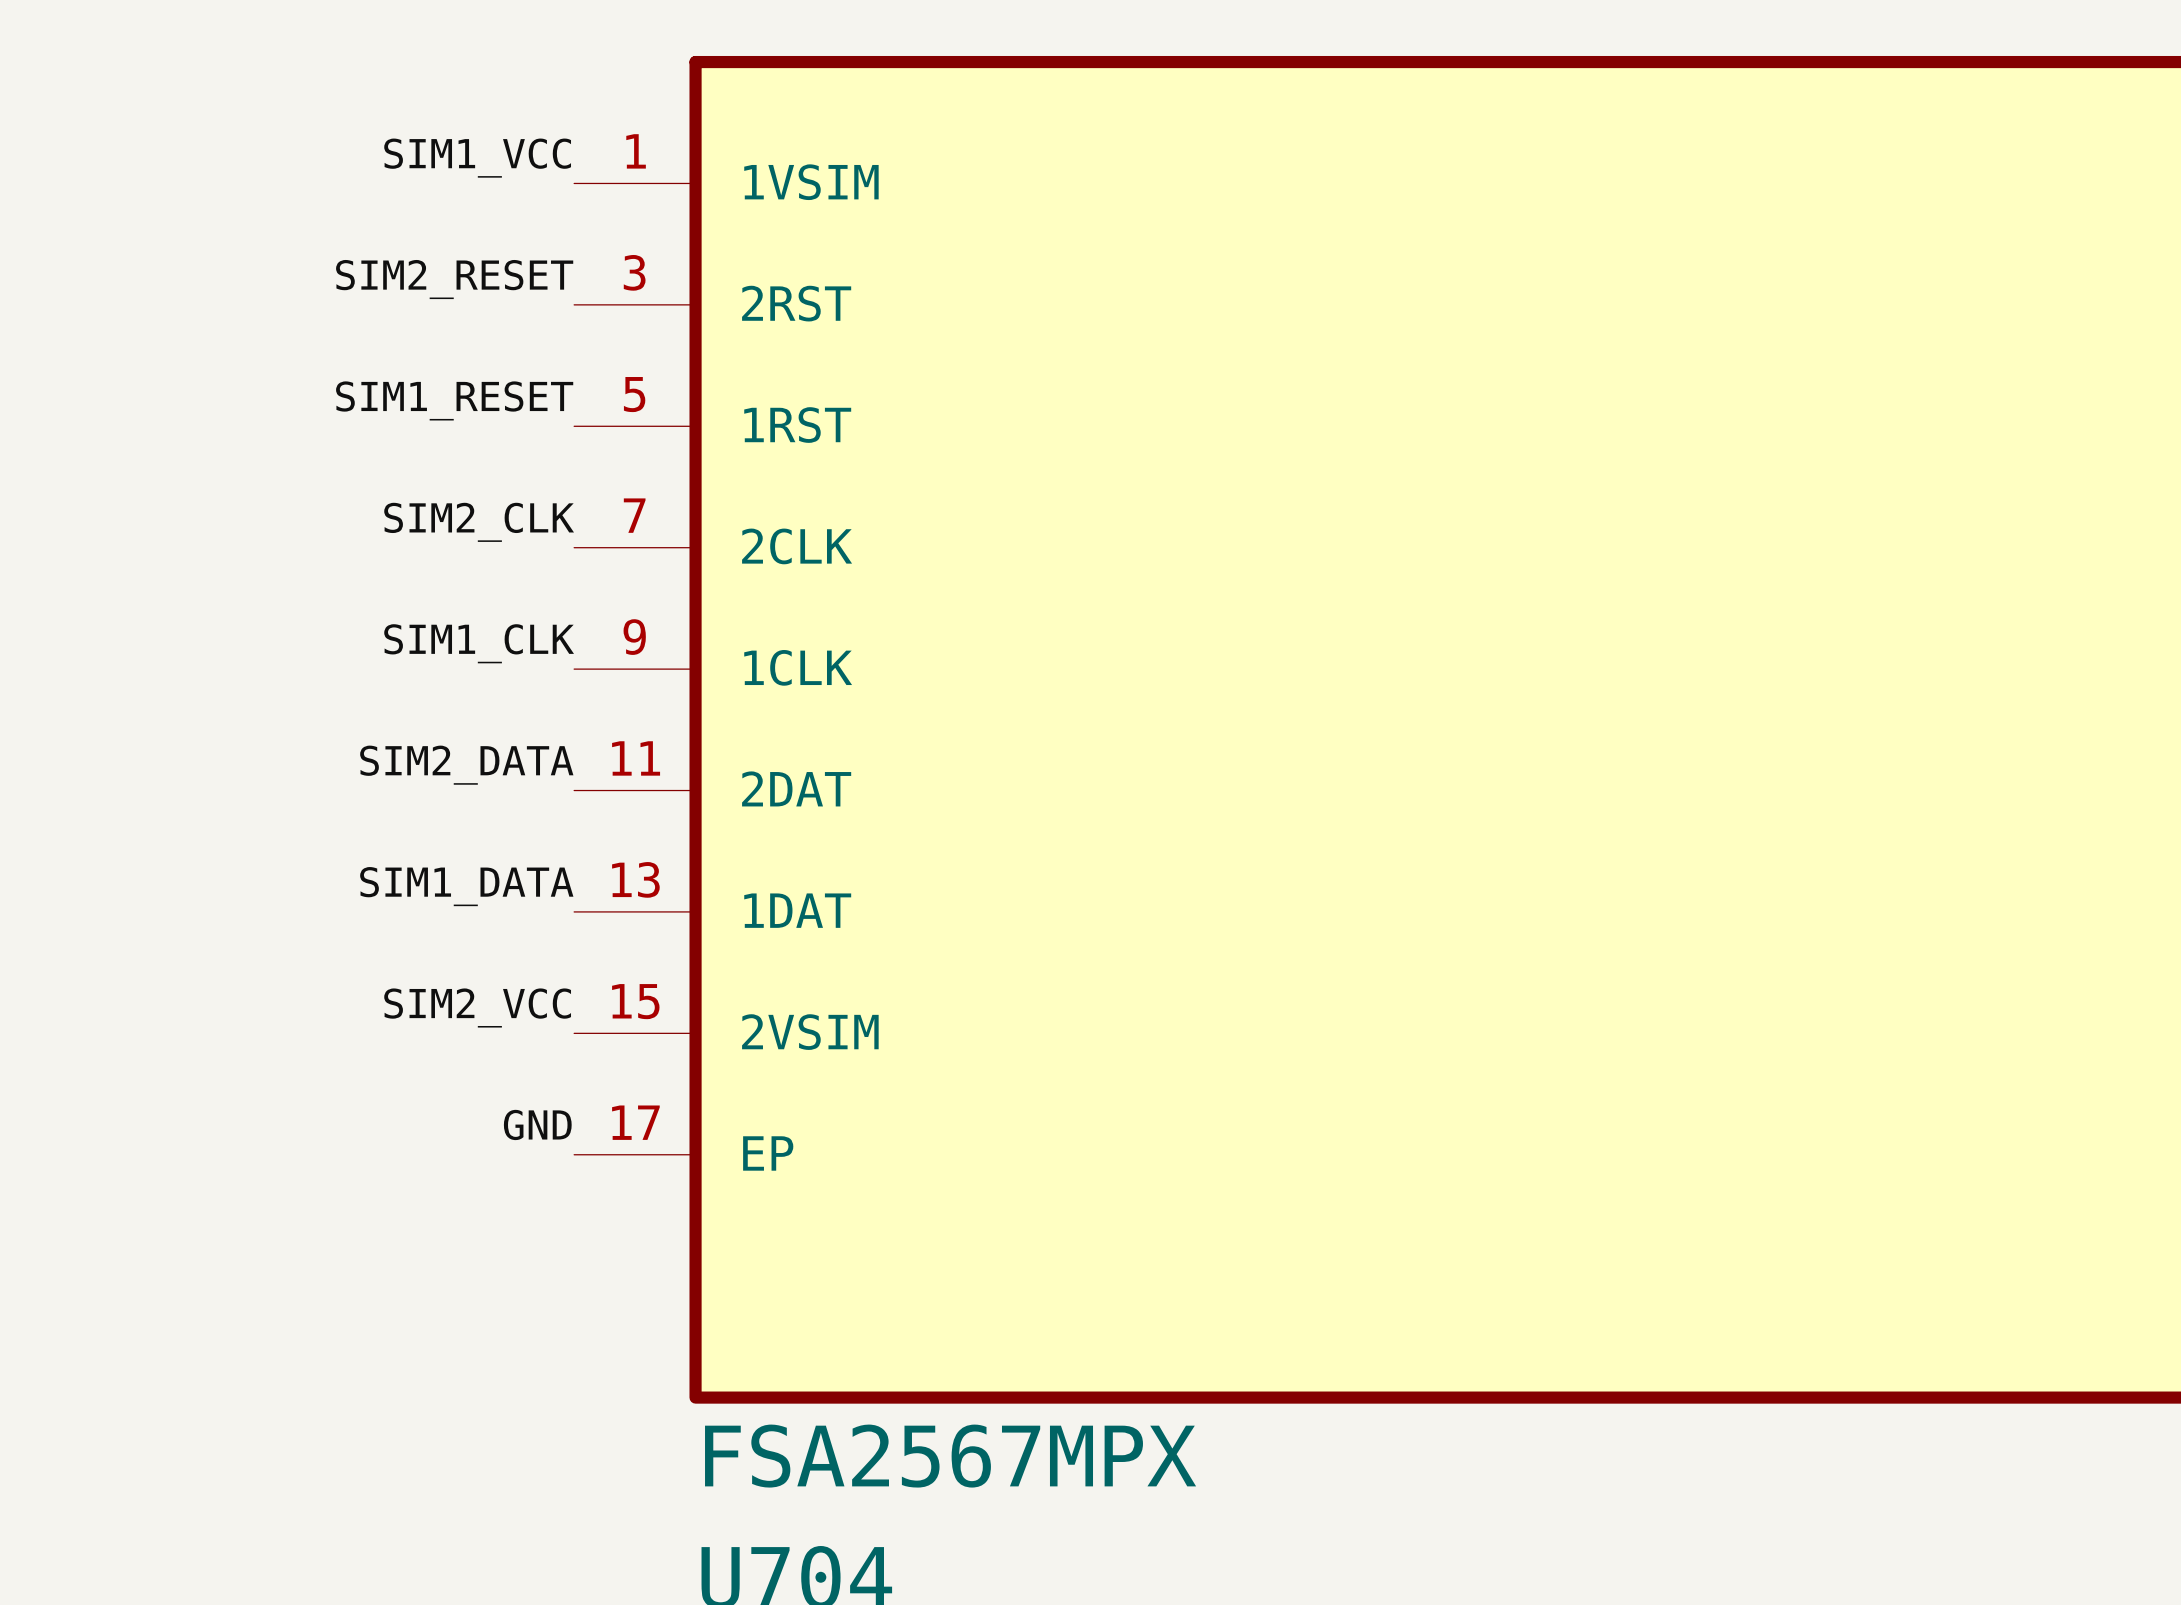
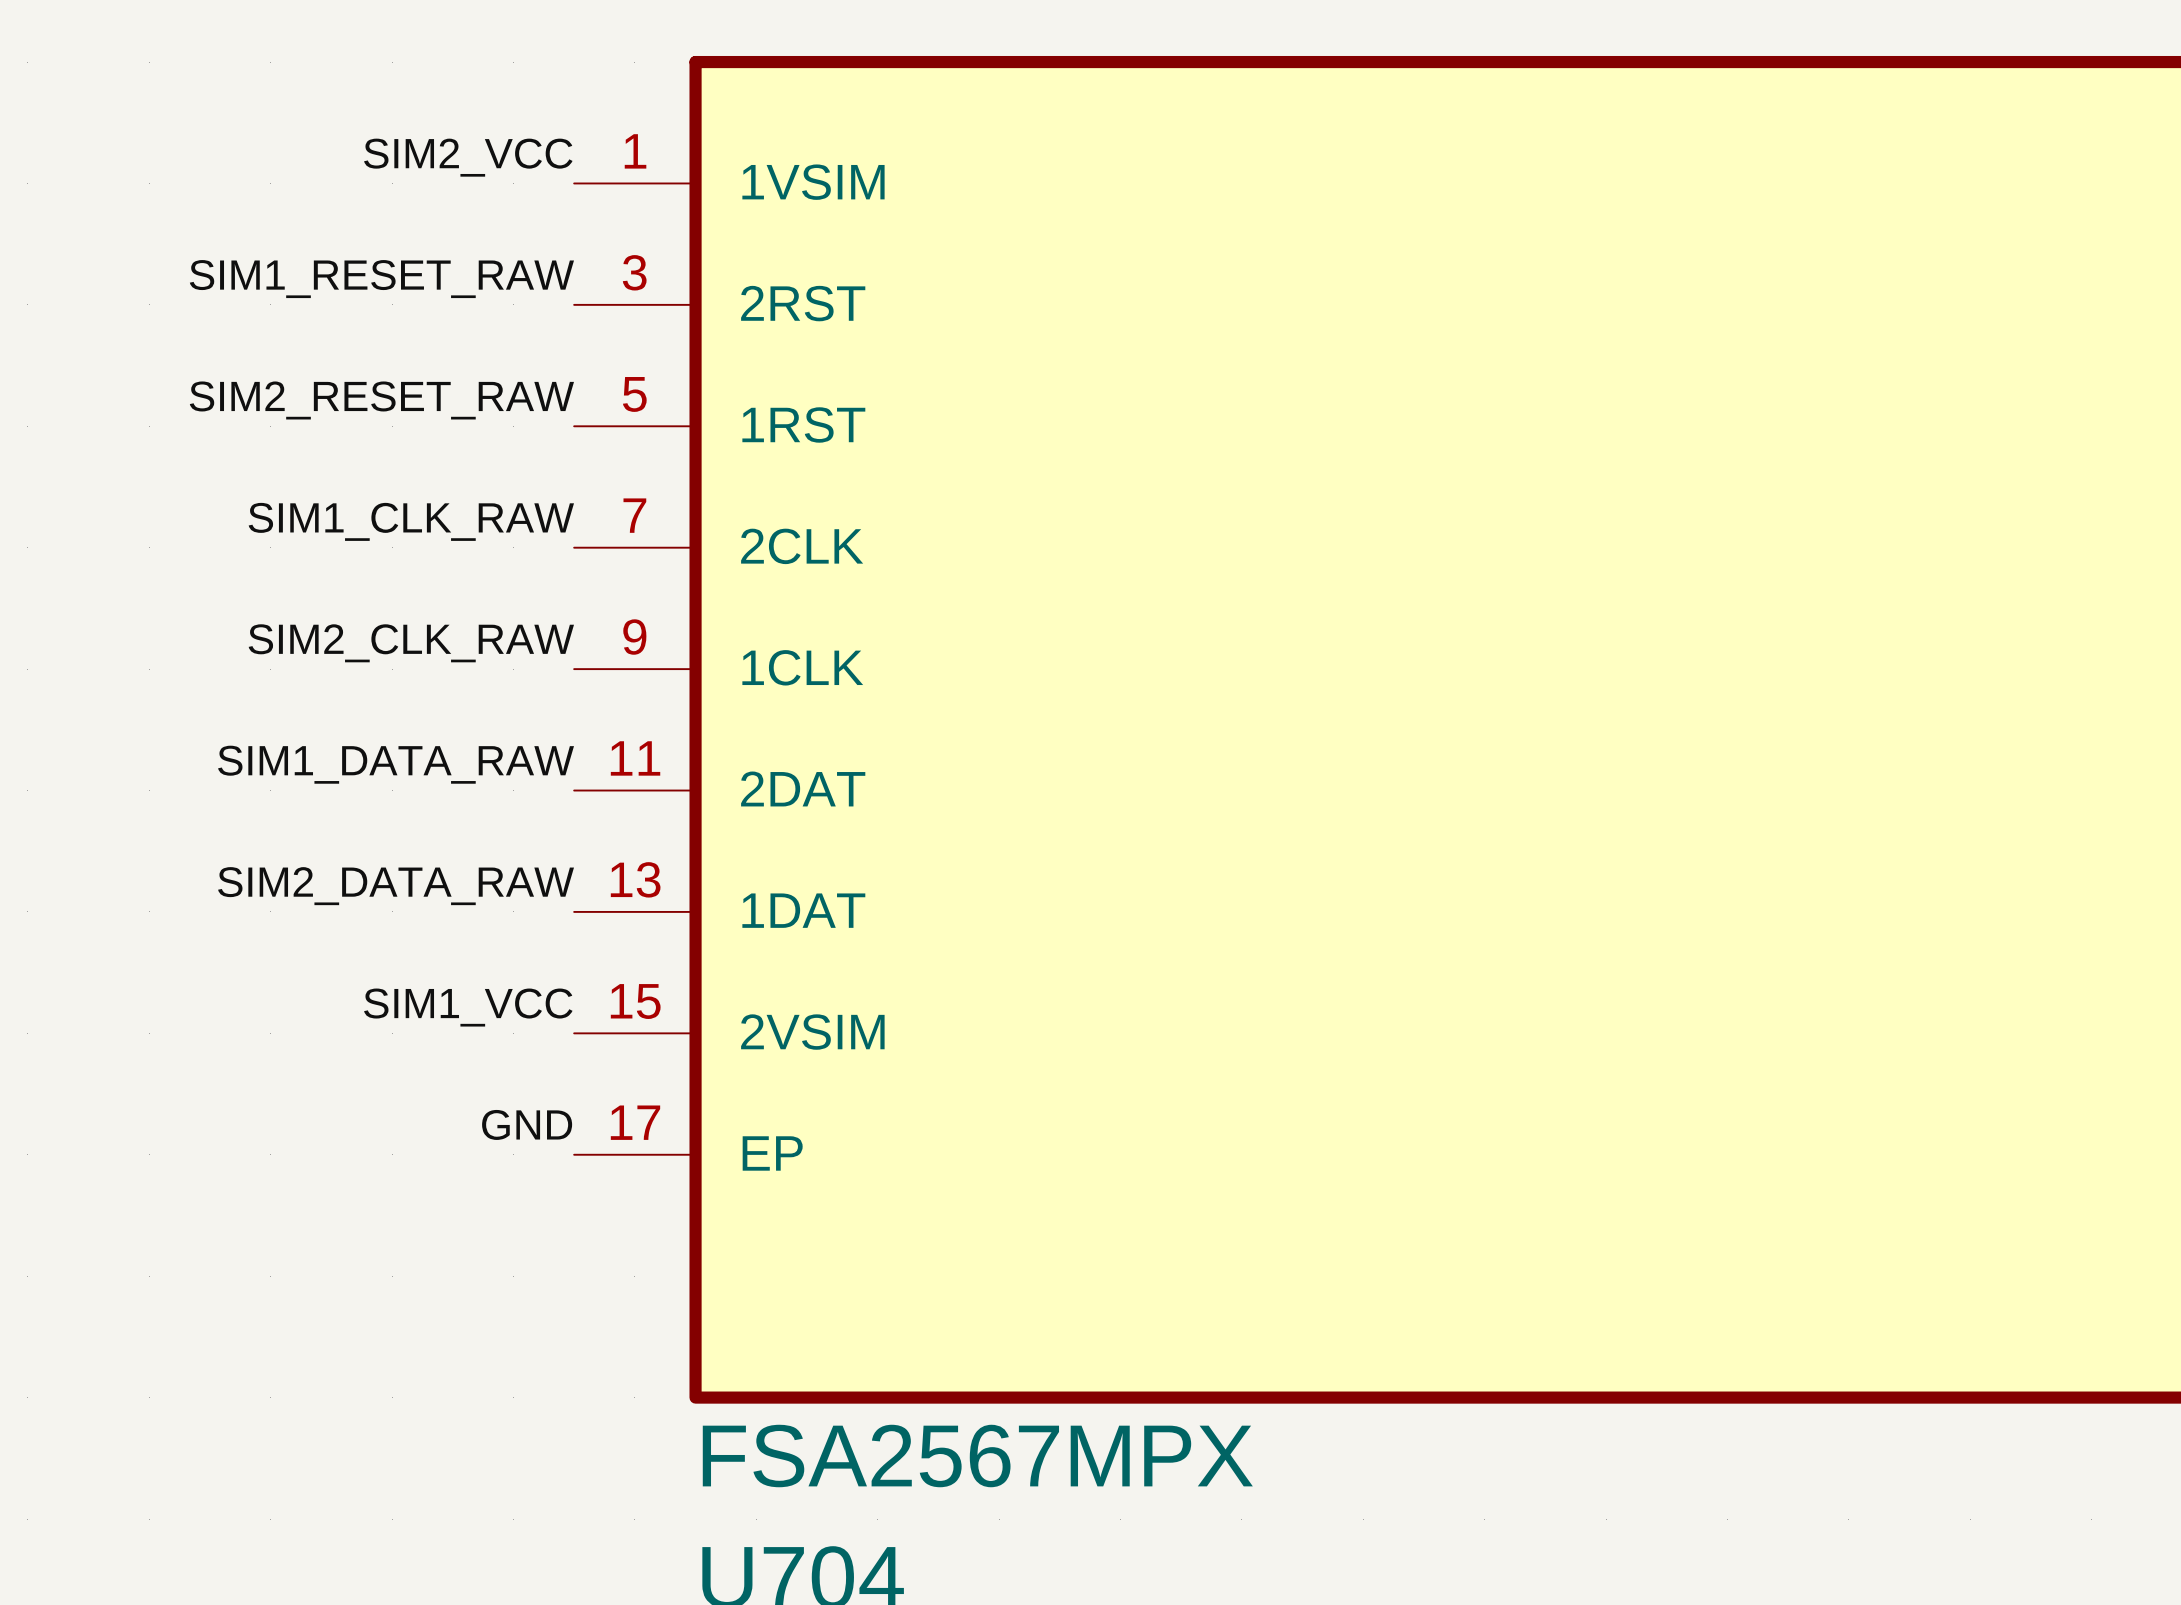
label: SIM1_VCC (477, 158) -> SIM2_VCC (468, 157)
label: SIM2_RESET (454, 279) -> SIM1_RESET_RAW (381, 279)
label: SIM1_RESET (454, 400) -> SIM2_RESET_RAW (381, 400)
label: SIM2_CLK (479, 522) -> SIM1_CLK_RAW (411, 521)
label: SIM1_CLK (479, 643) -> SIM2_CLK_RAW (411, 643)
label: SIM2_DATA (466, 765) -> SIM1_DATA_RAW (396, 764)
label: SIM1_DATA (466, 886) -> SIM2_DATA_RAW (396, 886)
label: SIM2_VCC (477, 1007) -> SIM1_VCC (468, 1007)

